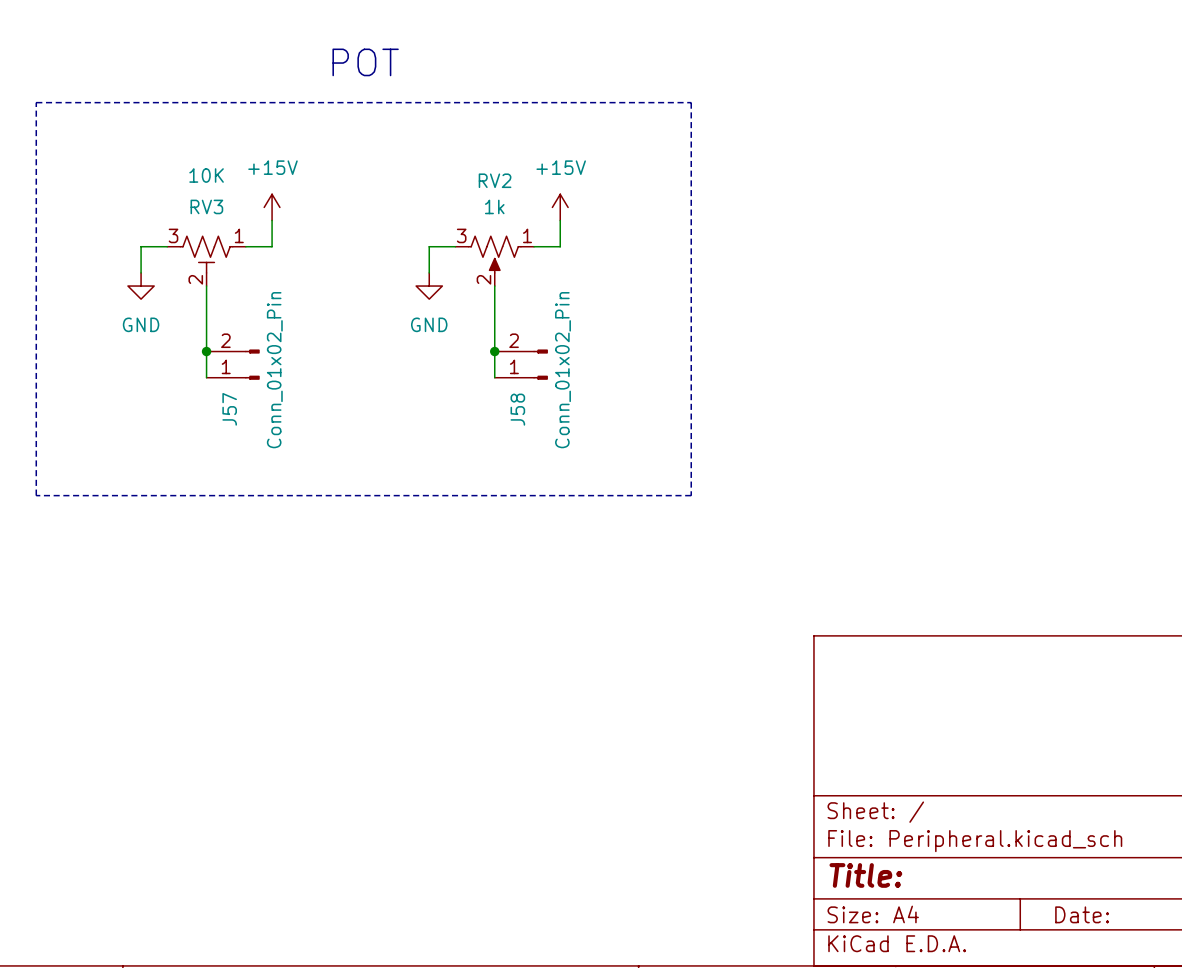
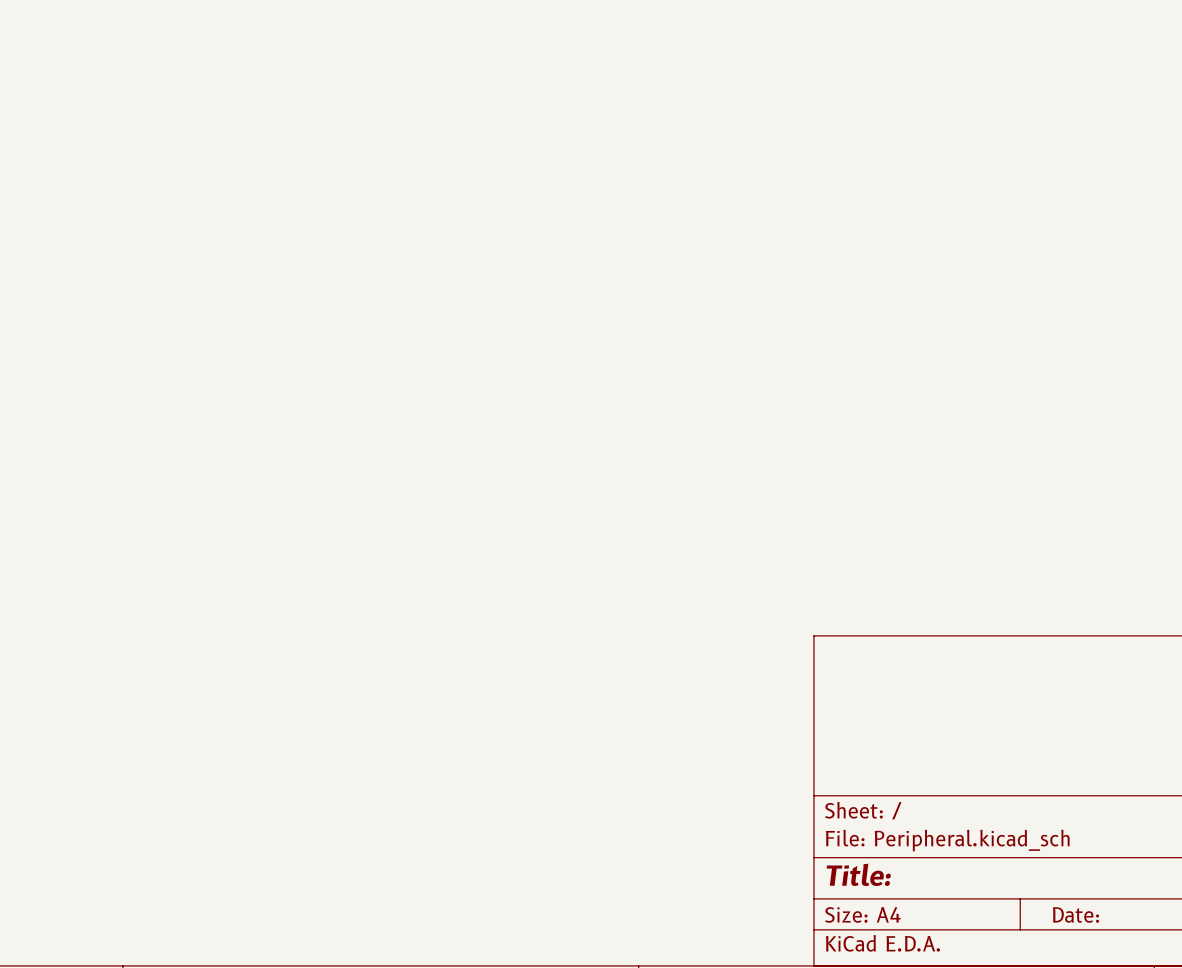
text: POT (365, 62) -> none
line: (36, 102) (691, 102) (691, 495) (36, 495) (36, 102) -> none
power symbol: +15V (272, 207) -> none
power symbol: +15V (560, 207) -> none
wire: (272, 220) (272, 246) (245, 246) -> none
wire: (560, 220) (560, 246) (534, 246) -> none
wire: (167, 246) (141, 246) (141, 272) -> none
wire: (455, 246) (429, 246) (429, 272) -> none
RV3: 10K (206, 261) -> none
RV2: 1k (494, 261) -> none
power symbol: GND (141, 286) -> none
wire: (206, 286) (206, 377) -> none
power symbol: GND (429, 286) -> none
wire: (494, 286) (494, 377) -> none
junction: (206, 351) -> none
junction: (494, 351) -> none
J57: Conn_01x02_Pin (233, 364) -> none
J58: Conn_01x02_Pin (521, 364) -> none

